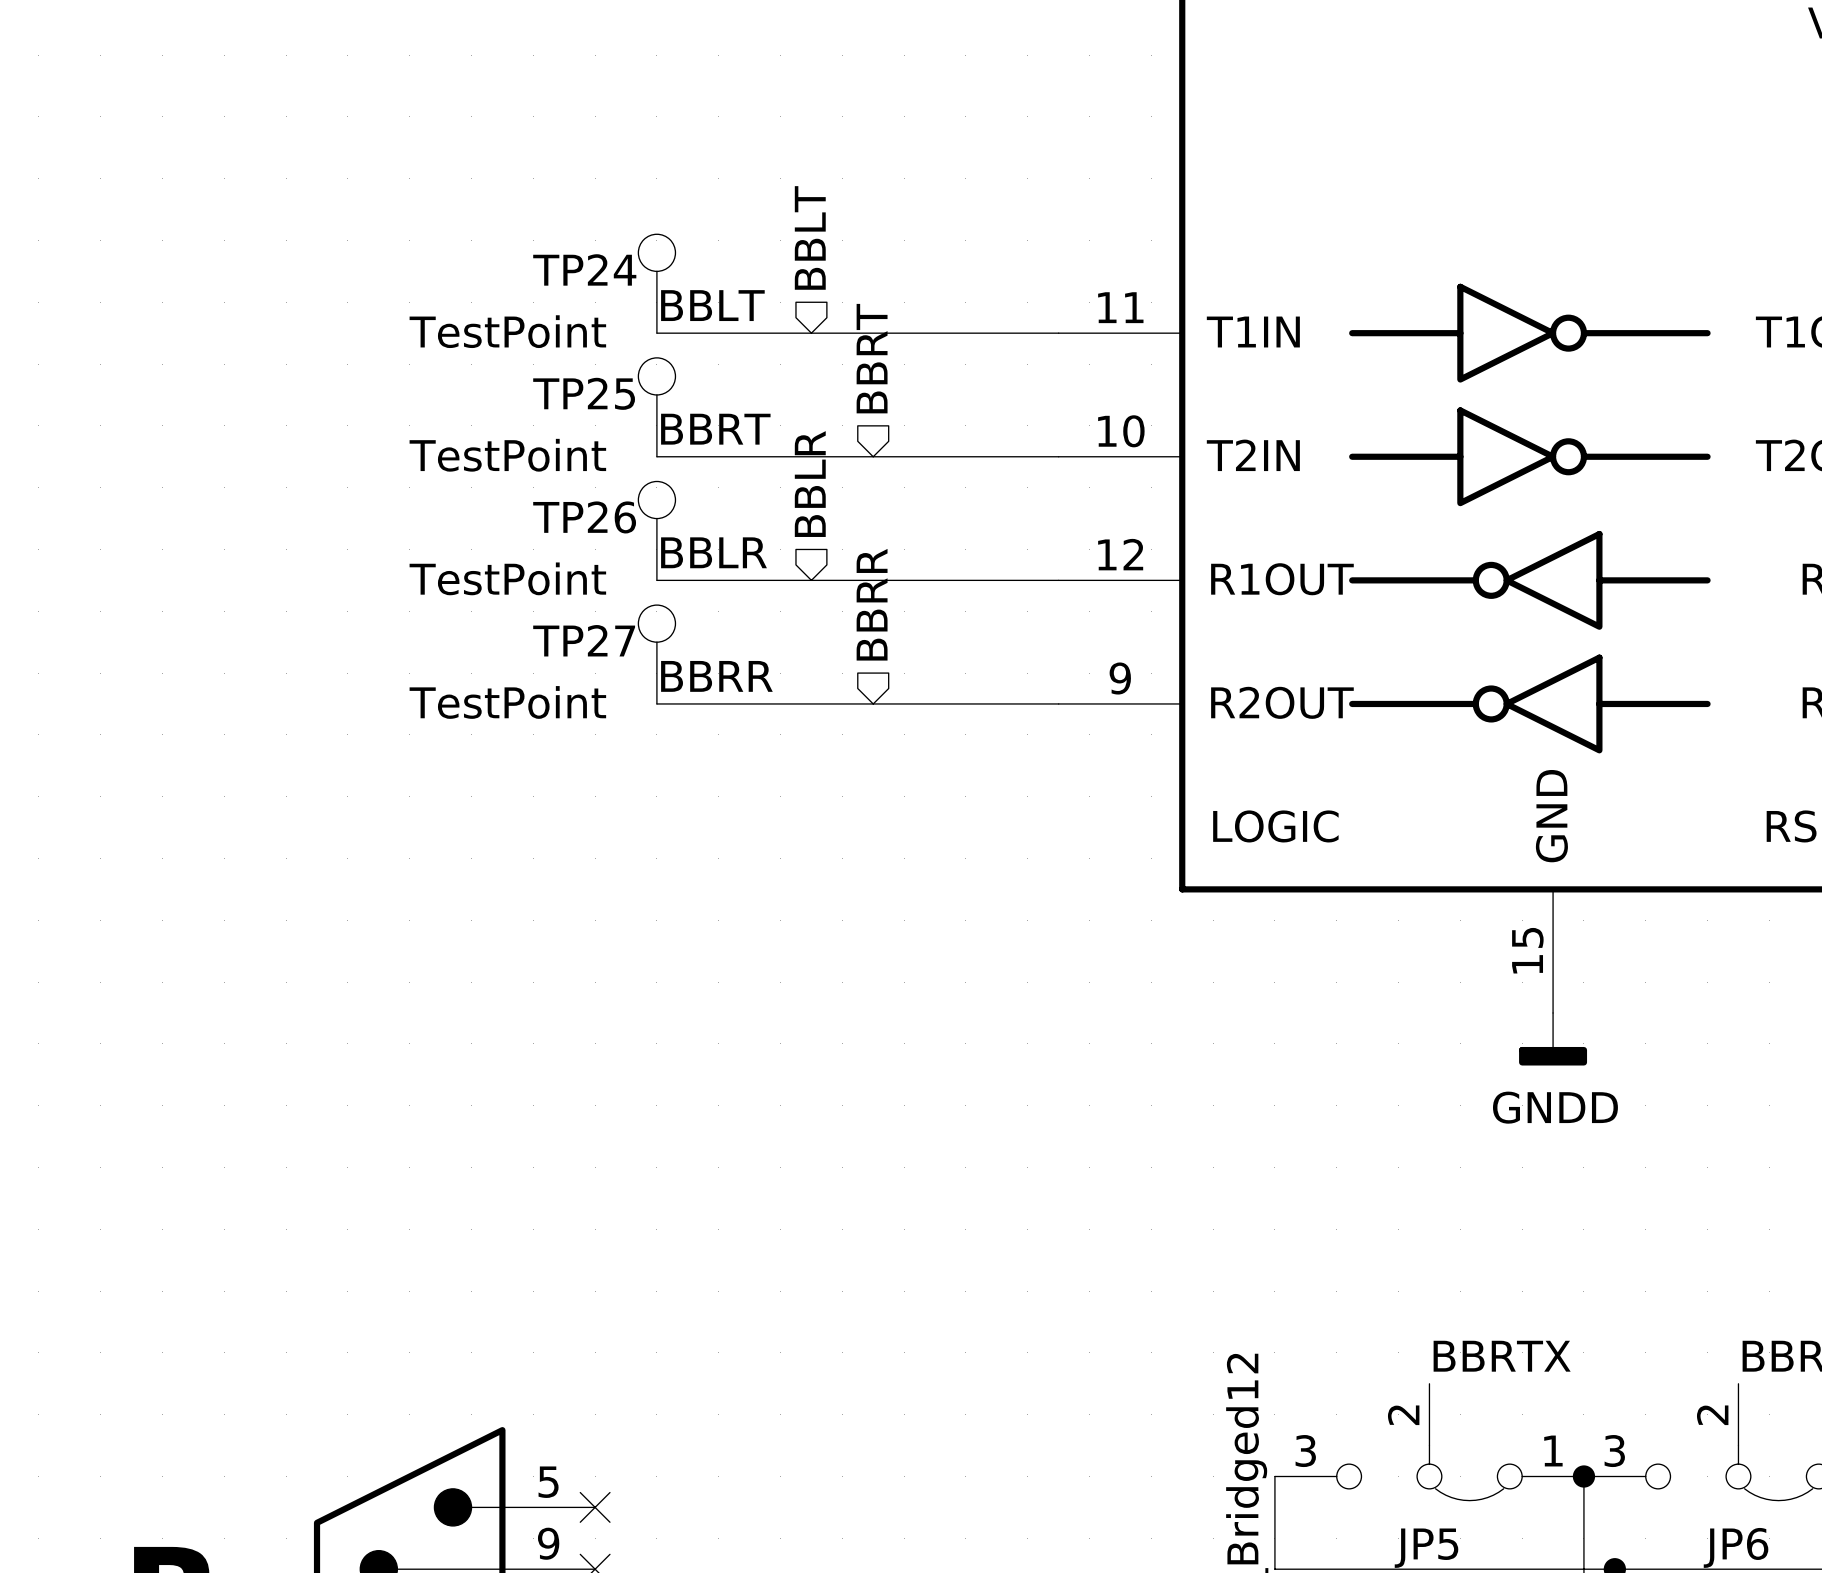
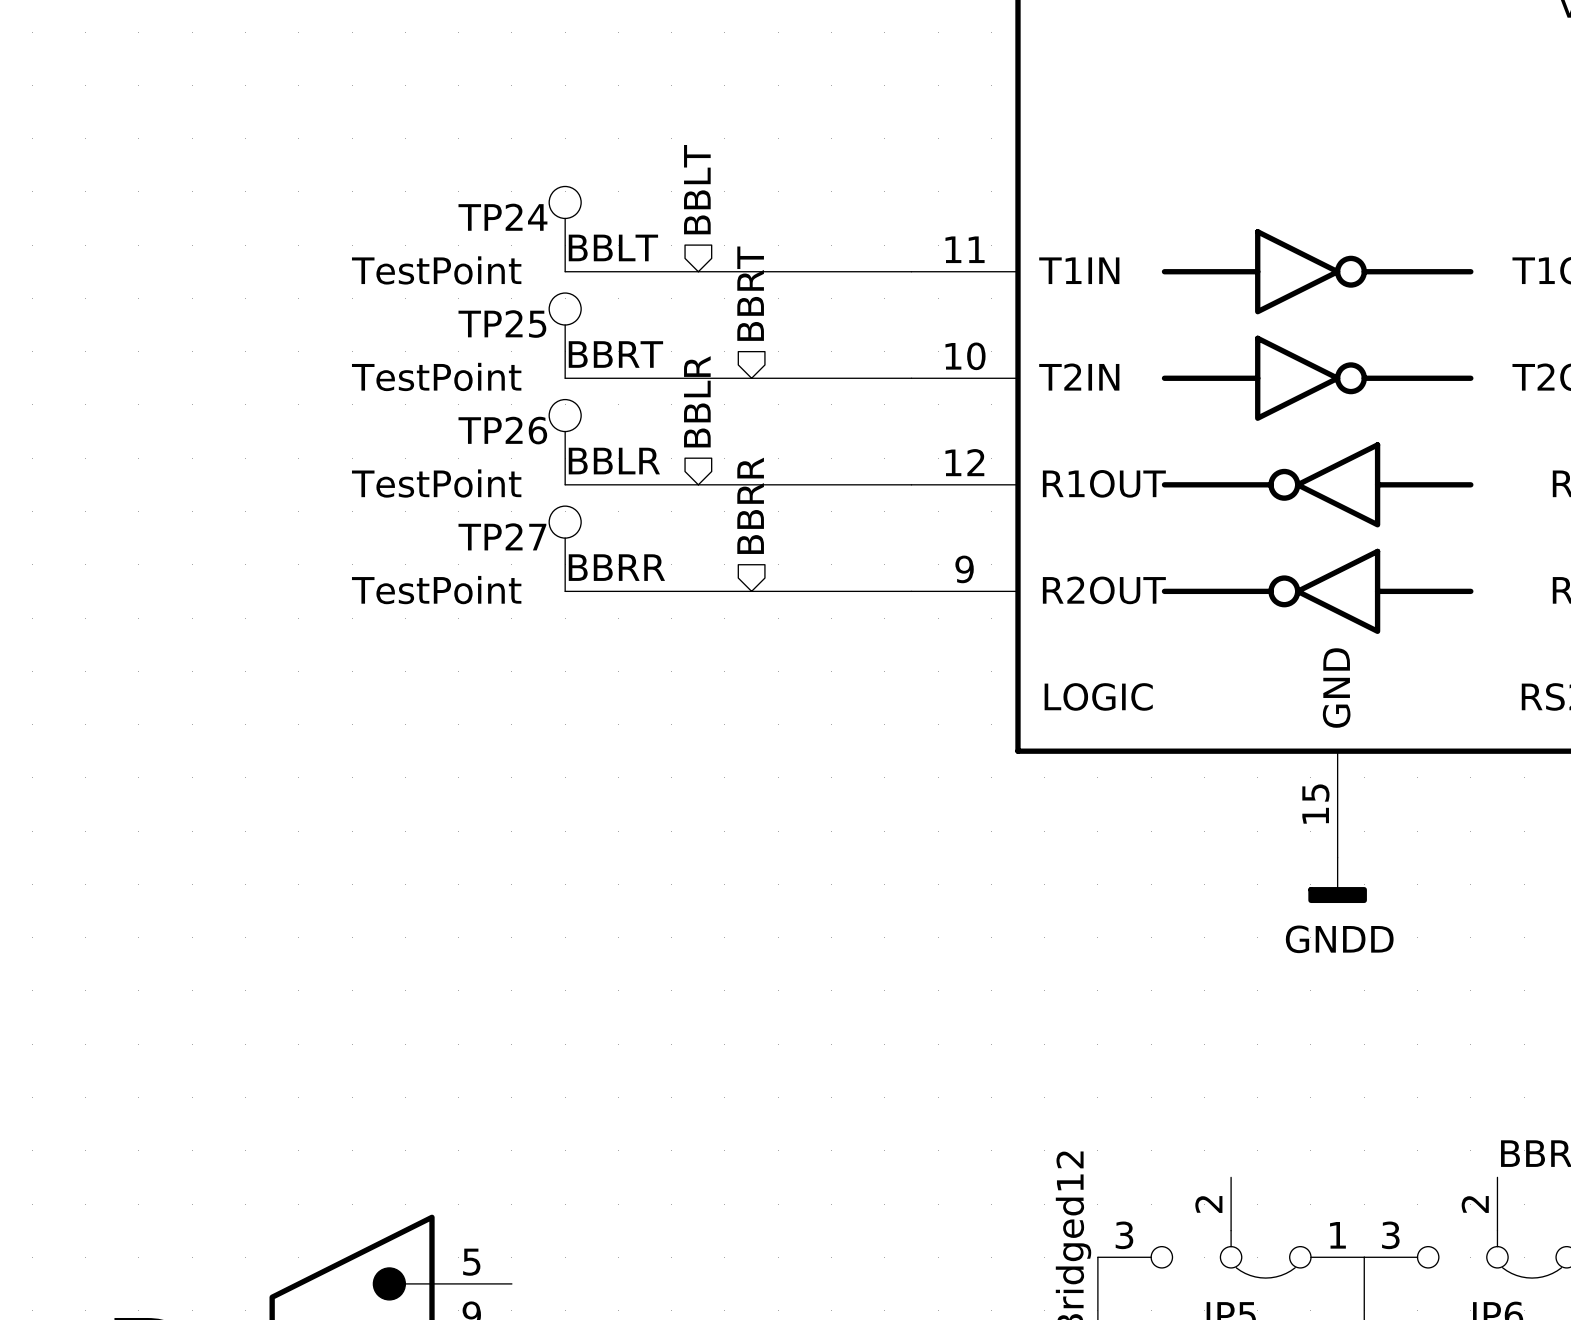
label: BBRTX (1502, 1356) -> none
junction: (1583, 1476) -> none
no-connect mark: (595, 1507) -> none

